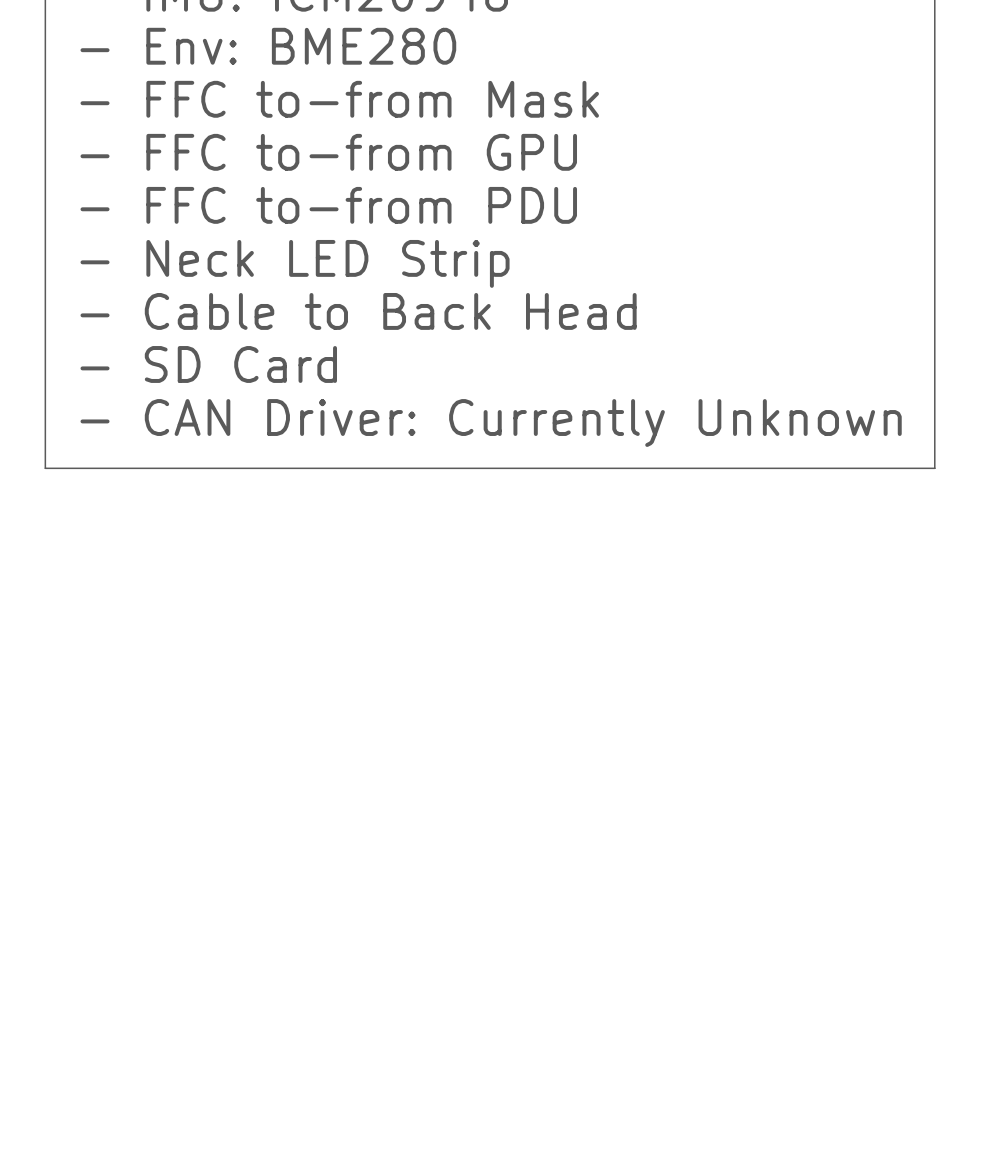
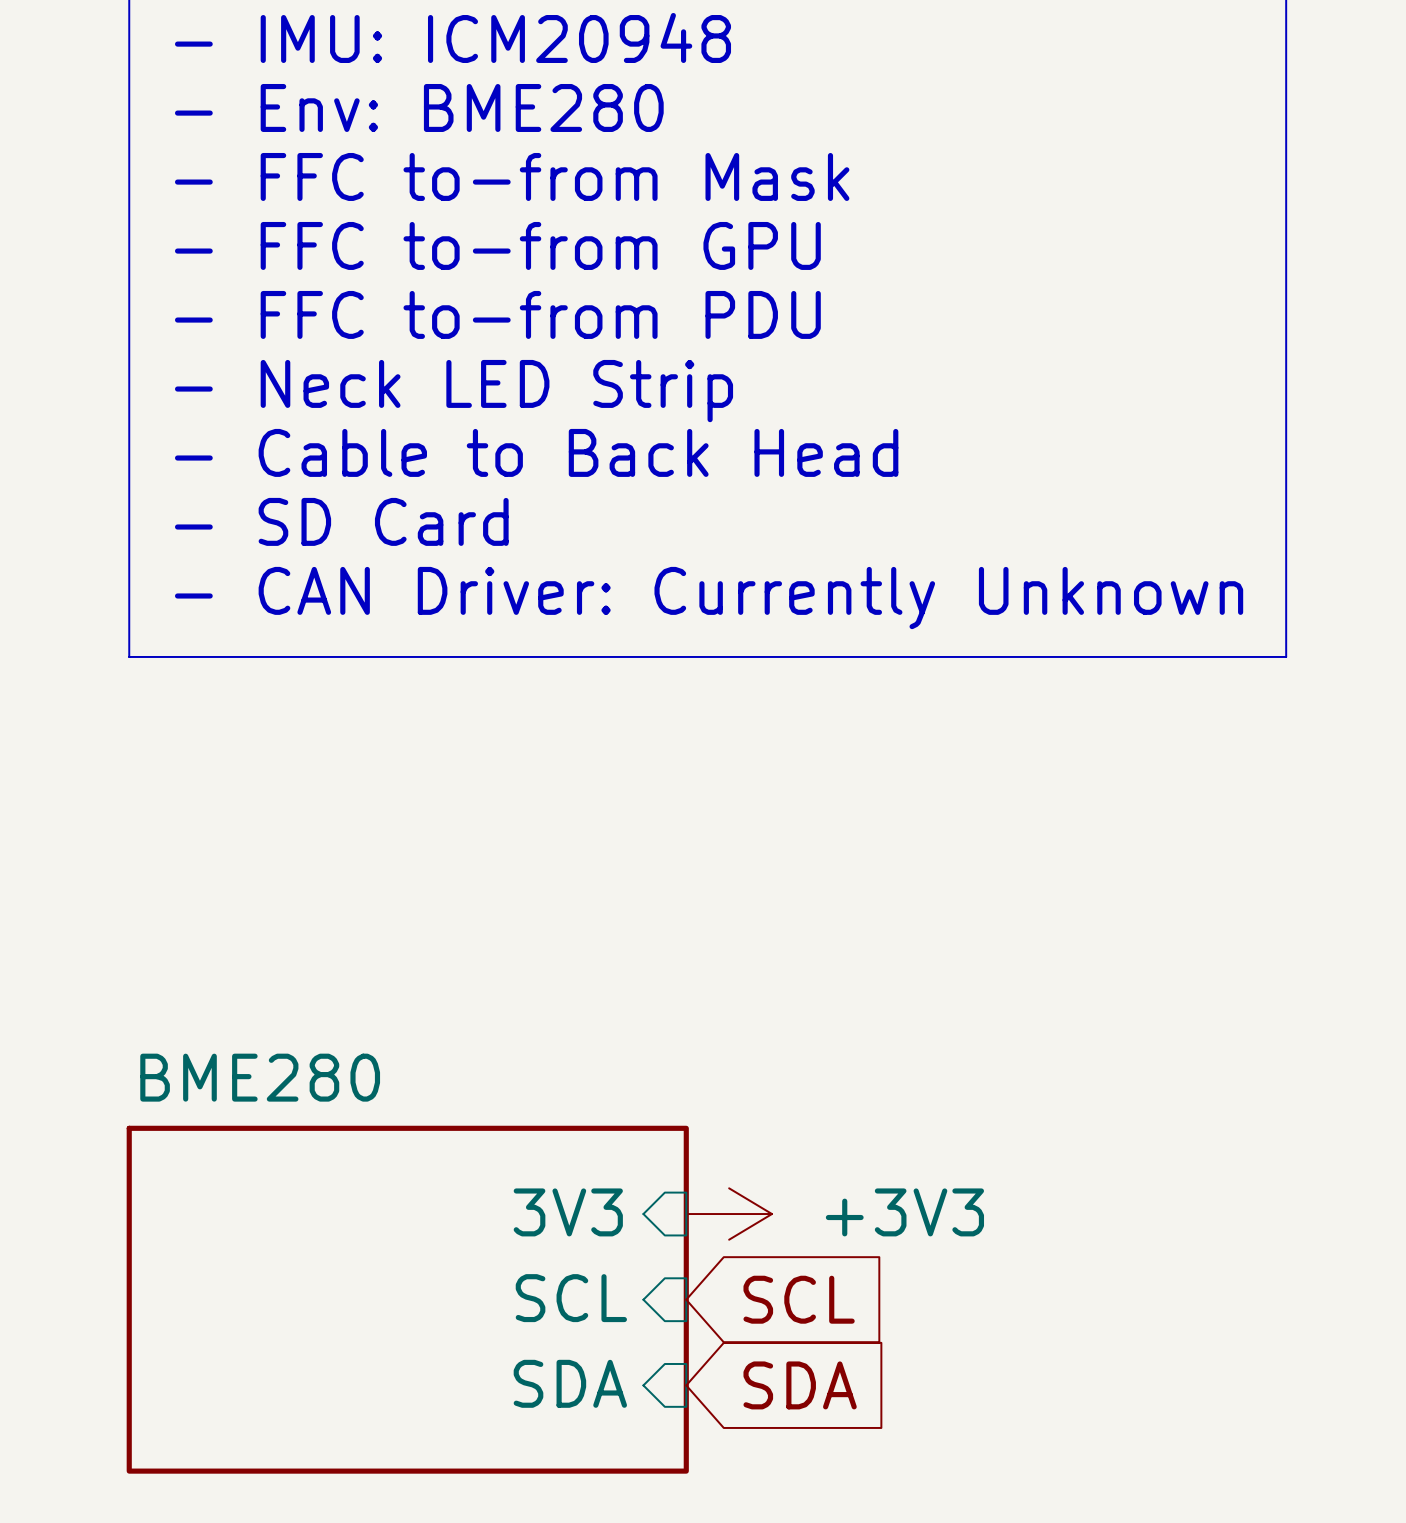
sheet pin: none -> 3V3 (568, 1212)
power symbol: none -> +3V3 (729, 1214)
sheet pin: none -> SCL (571, 1298)
sheet BME280: none -> (407, 1299)
global label: none -> SCL (799, 1299)
sheet pin: none -> SDA (570, 1383)
global label: none -> SDA (800, 1385)

